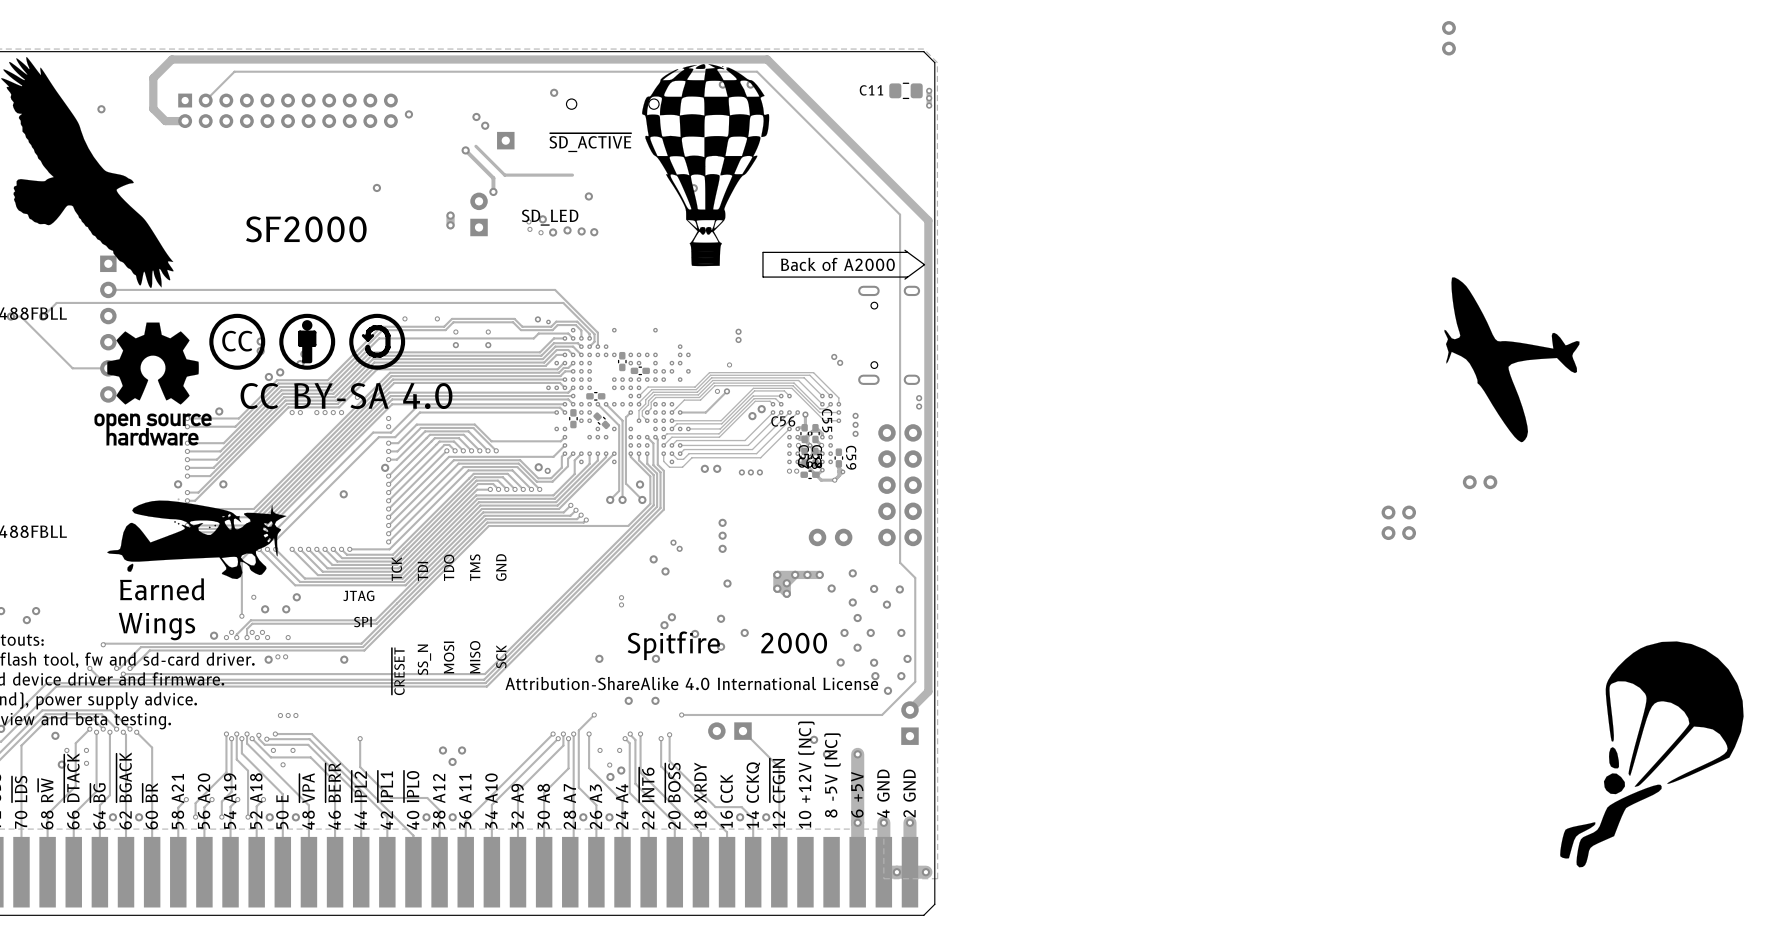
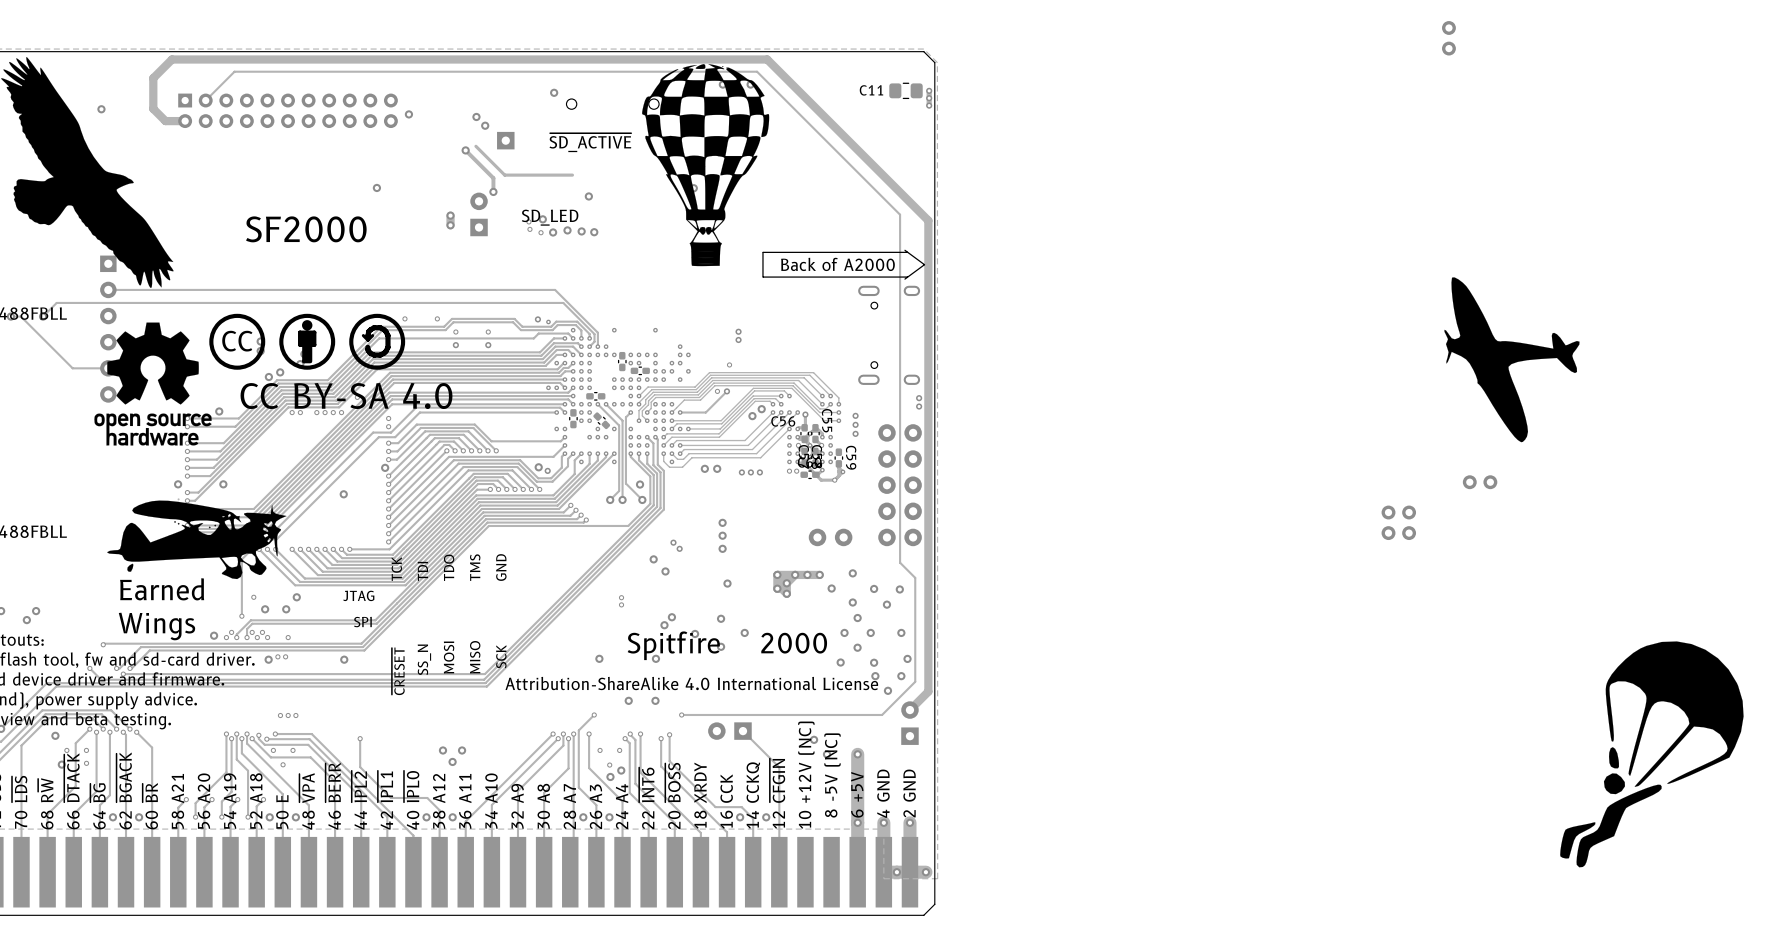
via: (834, 356) -> none
via: (840, 362) -> none

